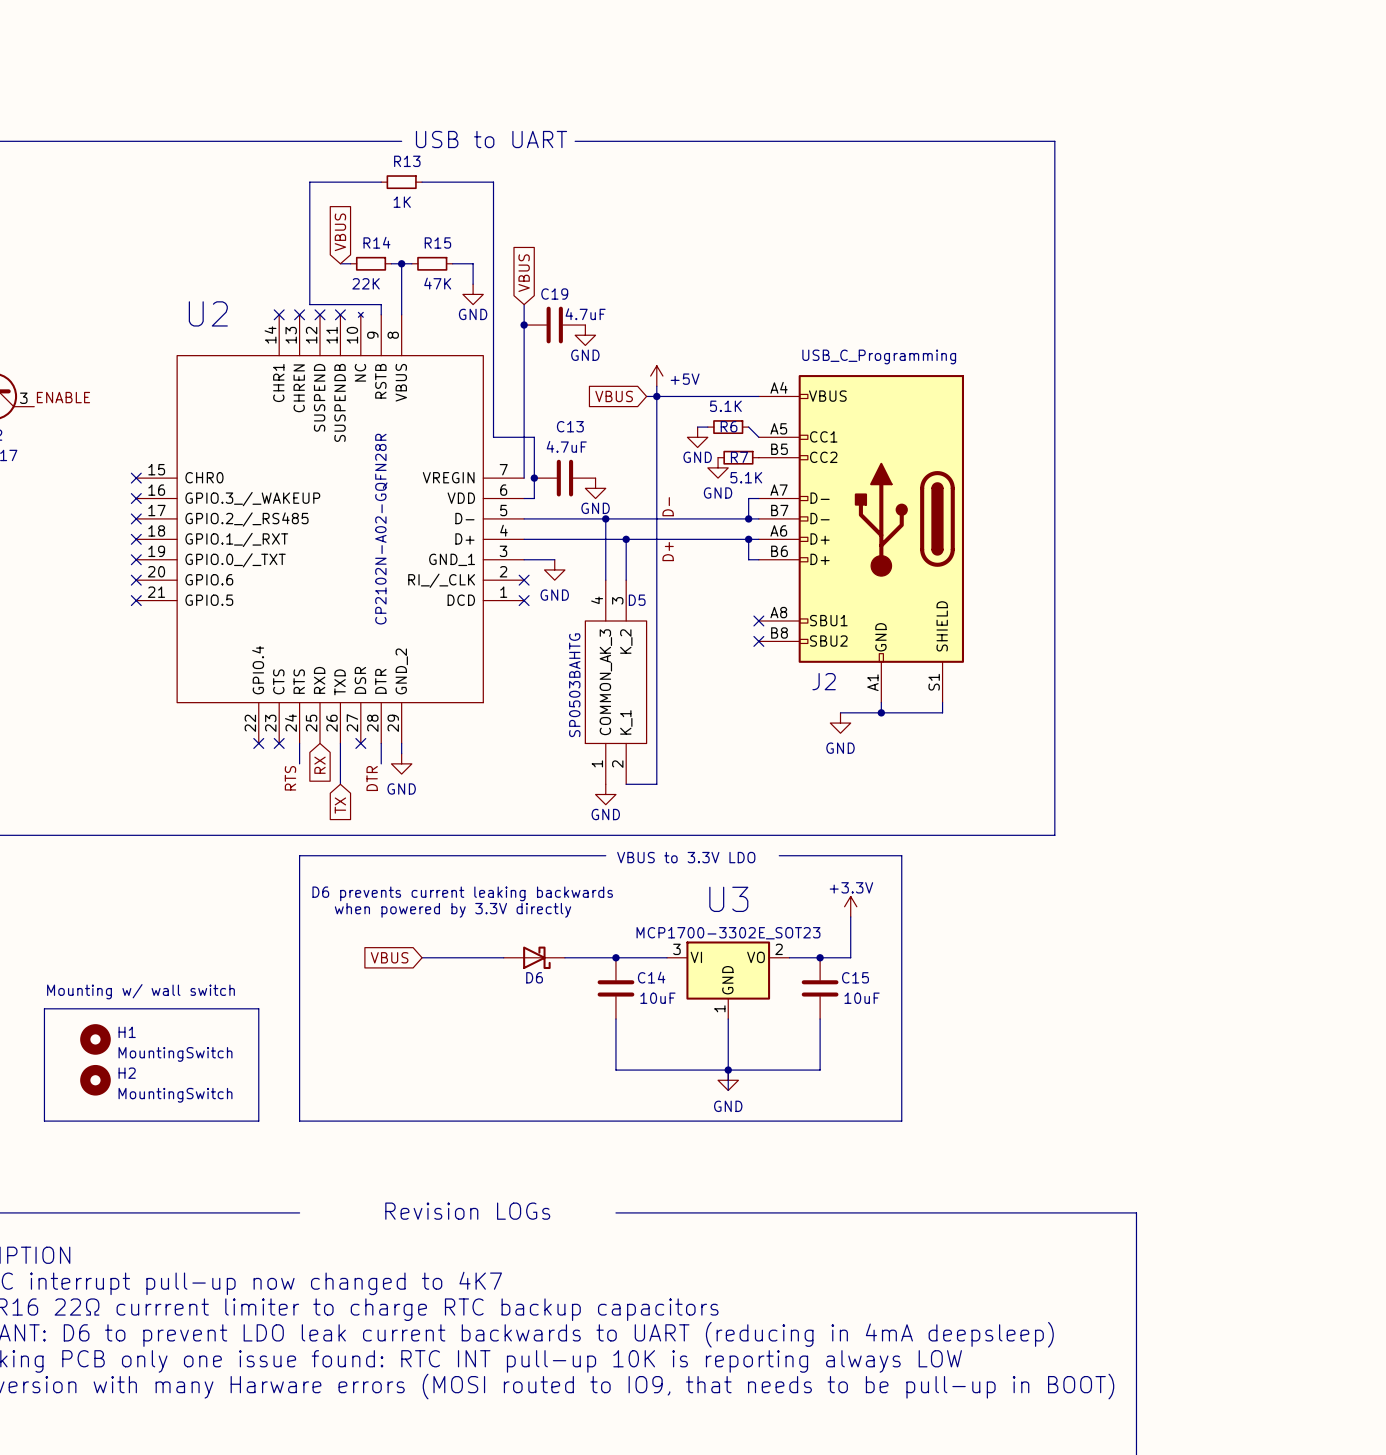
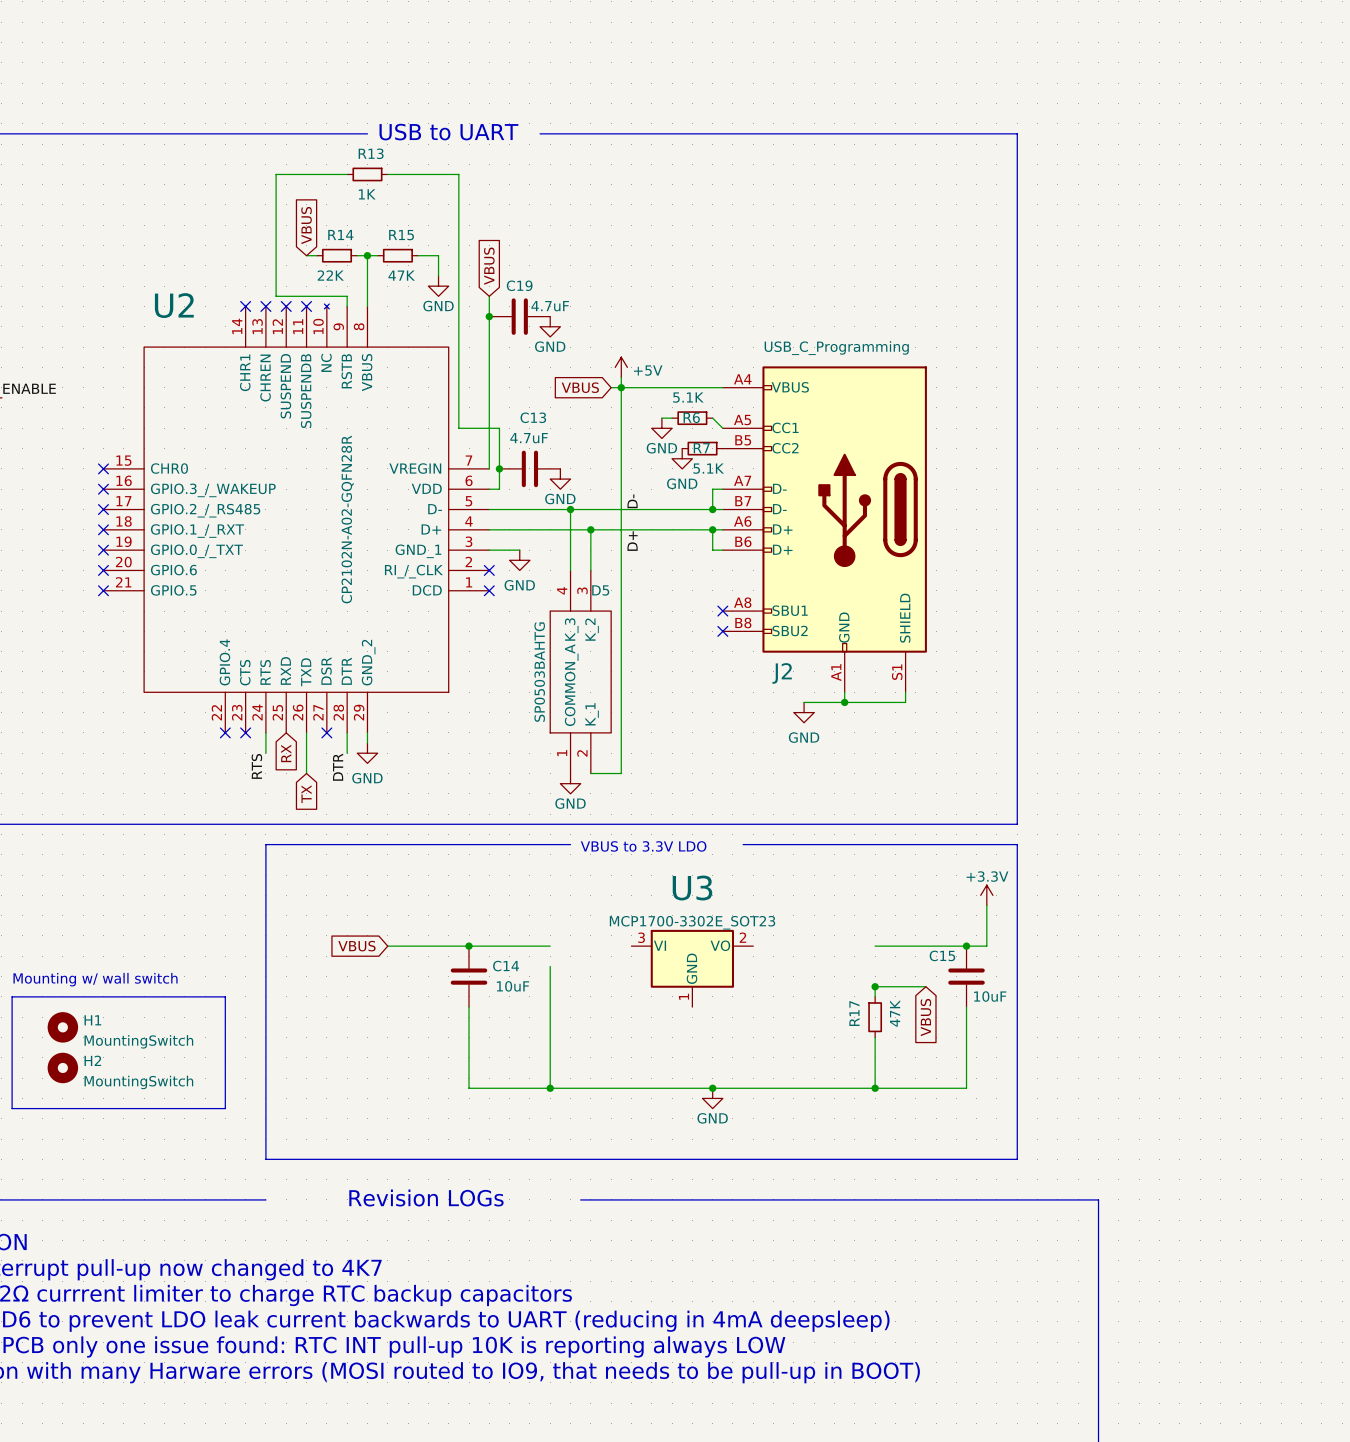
line: (901, 855) (901, 1121) (299, 1121) -> (864, 844) (1017, 844) (1017, 1159) (265, 1159) (265, 1108)
text: D6 prevents current leaking backwards (462, 893) -> none
power symbol position: +3.3V (850, 906) -> +3.3V (986, 895)
text: when powered by 3.3V directly (453, 910) -> none
wire: (850, 916) (850, 957) (789, 957) -> none
wire: none -> (986, 905) (986, 946) (875, 946)
junction: none -> (469, 946)
D6: (534, 957) -> none
wire: (585, 957) (667, 957) -> none
junction: (615, 957) -> none
junction: (820, 957) -> none
junction: none -> (966, 946)
C15 name position: C15 (855, 977) -> C15 (942, 955)
wire: none -> (550, 966) (550, 1088)
C14 position: (615, 988) -> (469, 976)
C15 position: (820, 988) -> (966, 976)
C15 value position: 10uF (862, 998) -> 10uF (990, 996)
junction: none -> (875, 986)
wire: none -> (925, 986) (875, 986) (875, 996)
wire: none -> (469, 1007) (469, 1088) (966, 1088) (966, 1007)
wire: (615, 1019) (615, 1070) (820, 1070) (820, 1019) -> none
wire: (728, 1019) (728, 1090) -> none
R17: none -> 47K (875, 1017)
global label: none -> VBUS (925, 1017)
wire: none -> (875, 1037) (875, 1088)
junction position: (728, 1070) -> (712, 1088)
power symbol position: GND (728, 1080) -> GND (712, 1098)
junction: none -> (550, 1088)
junction: none -> (875, 1088)
power symbol text position: GND (728, 1106) -> GND (712, 1118)

